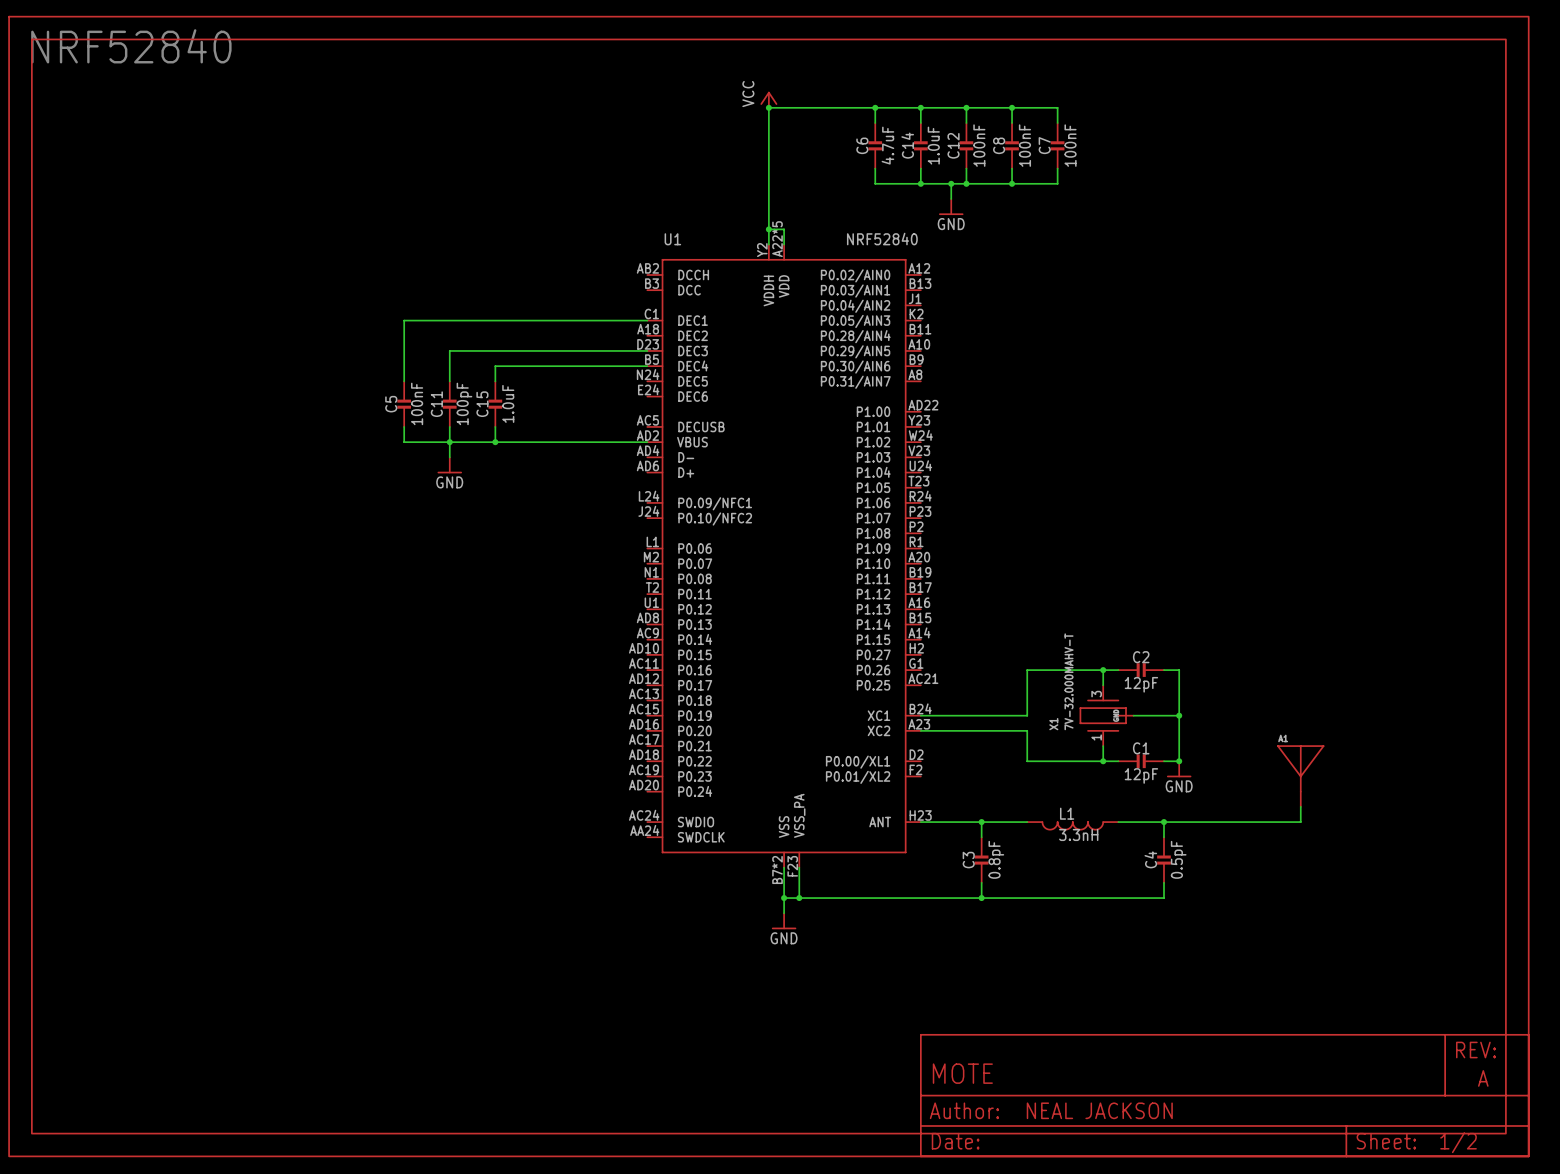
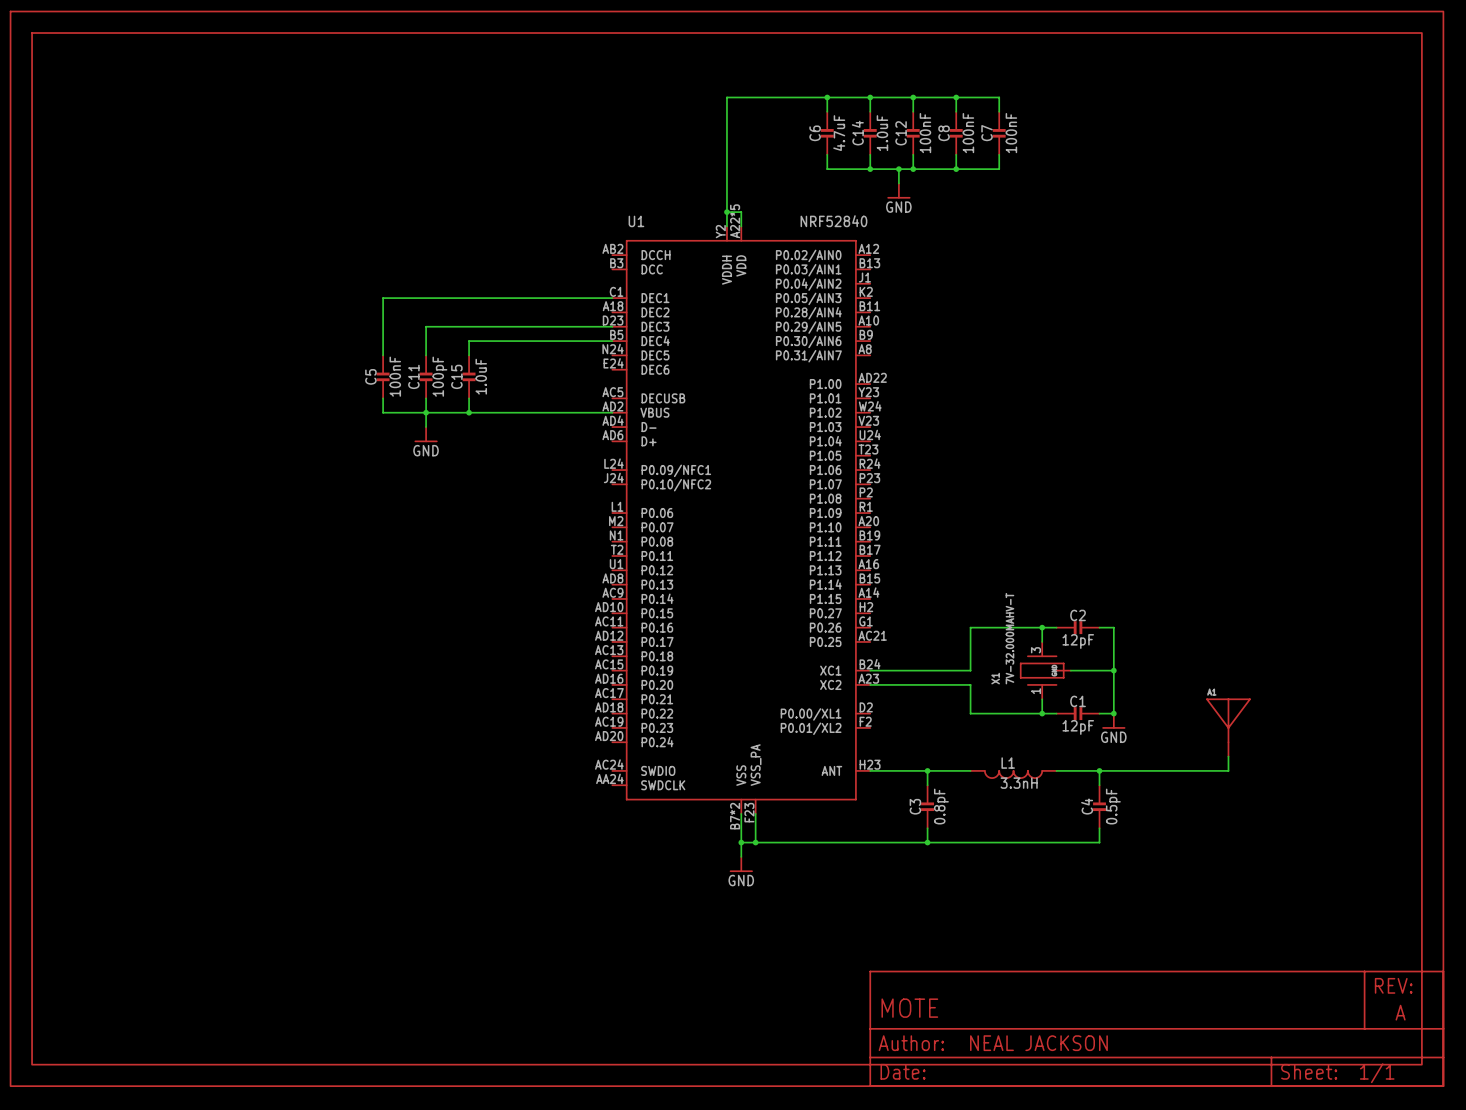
text: NRF52840 (131, 46) -> none
power symbol: VCC (768, 99) -> none
junction: (768, 107) -> none
part text: 1/2 (1458, 1142) -> 1/1 (1377, 1073)

